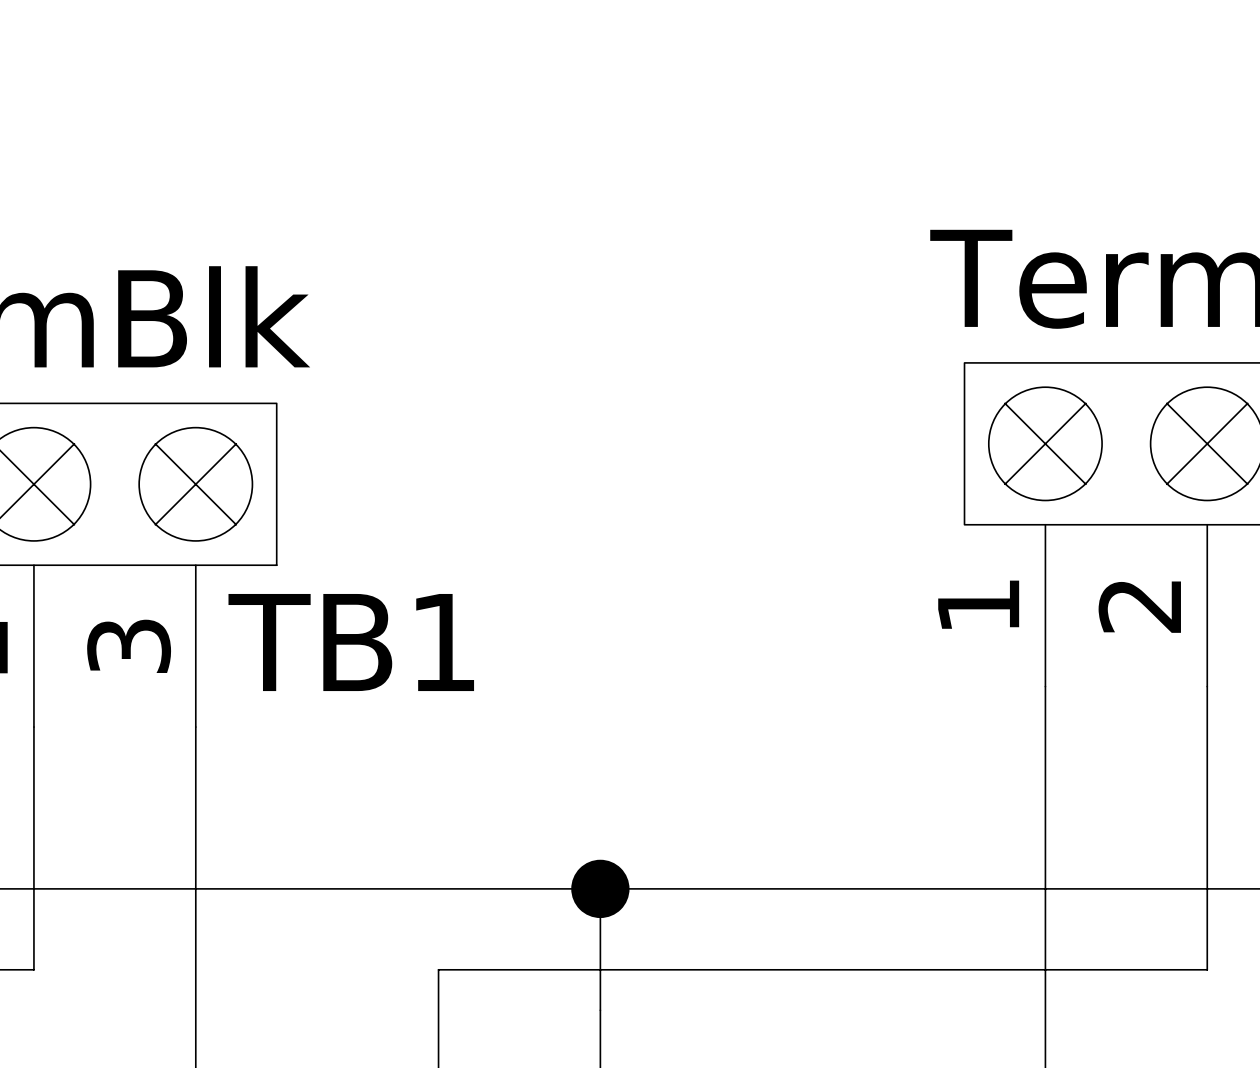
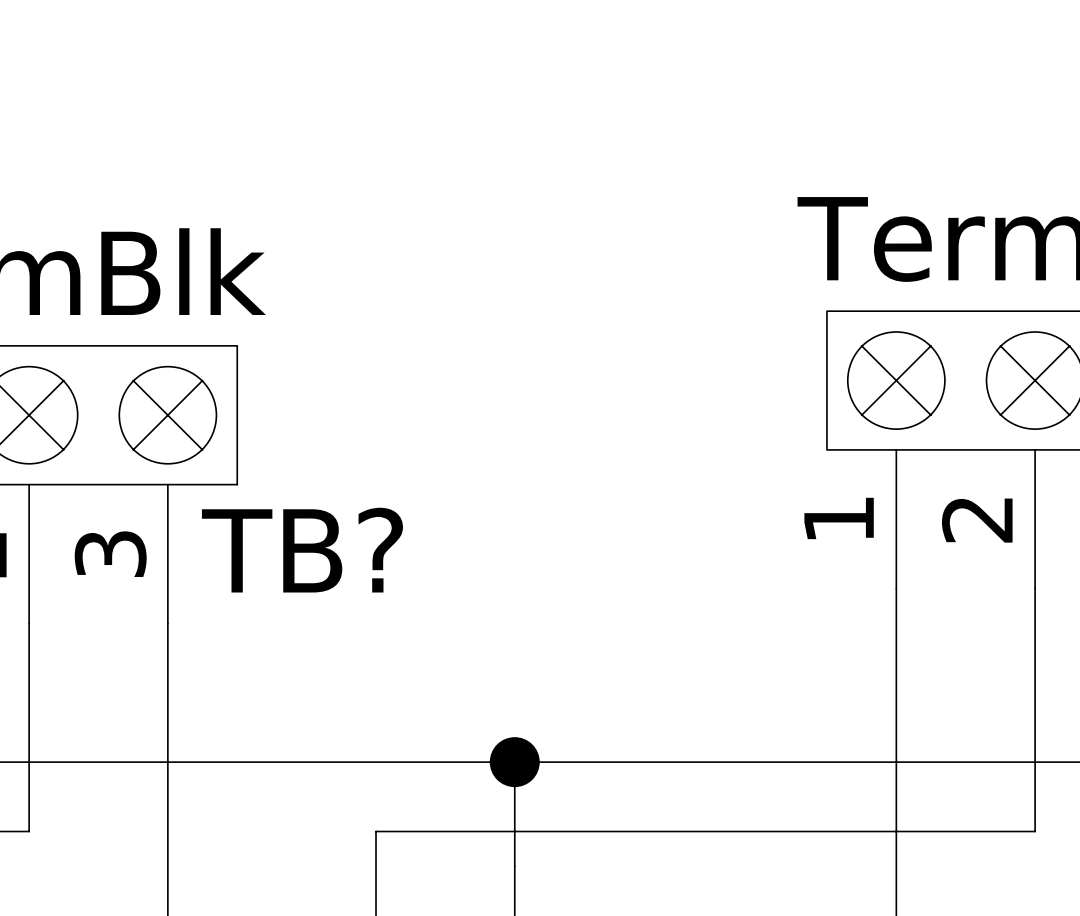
TB1 name: TB1 (351, 642) -> TB? (302, 550)

